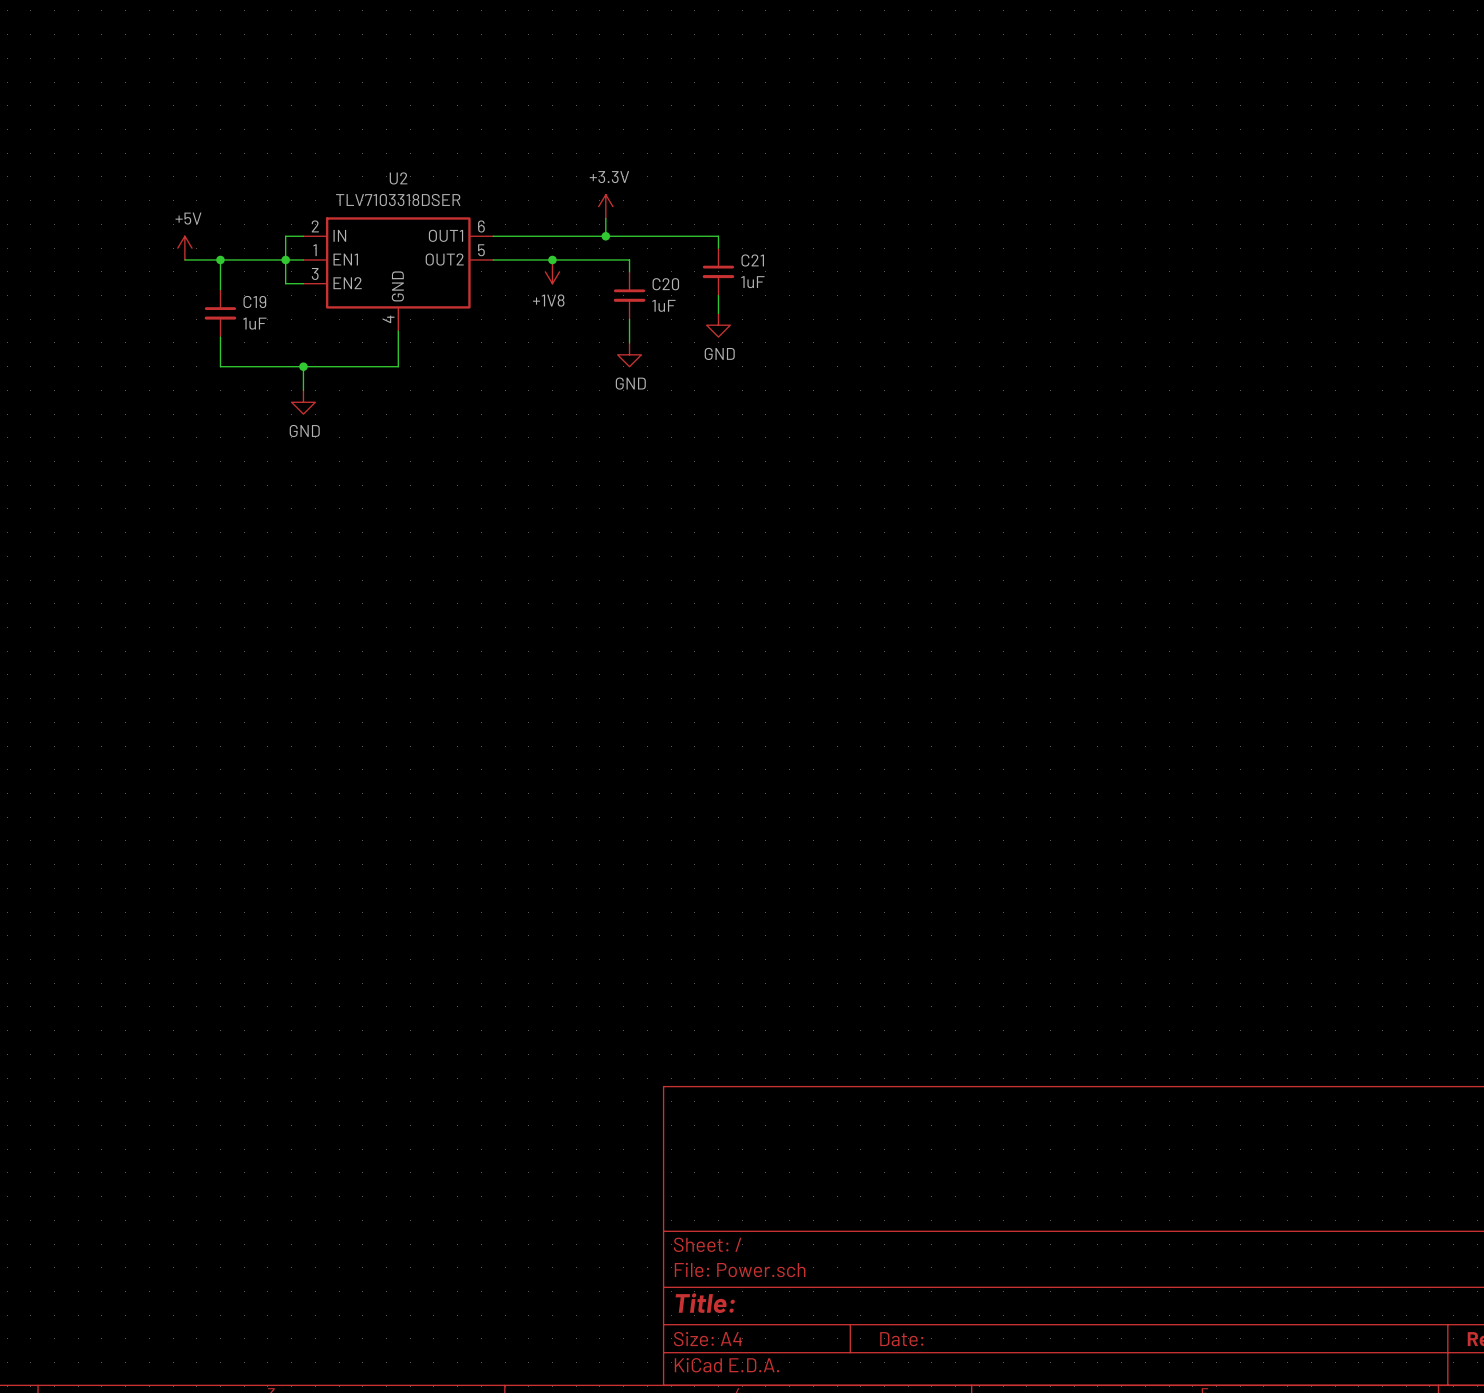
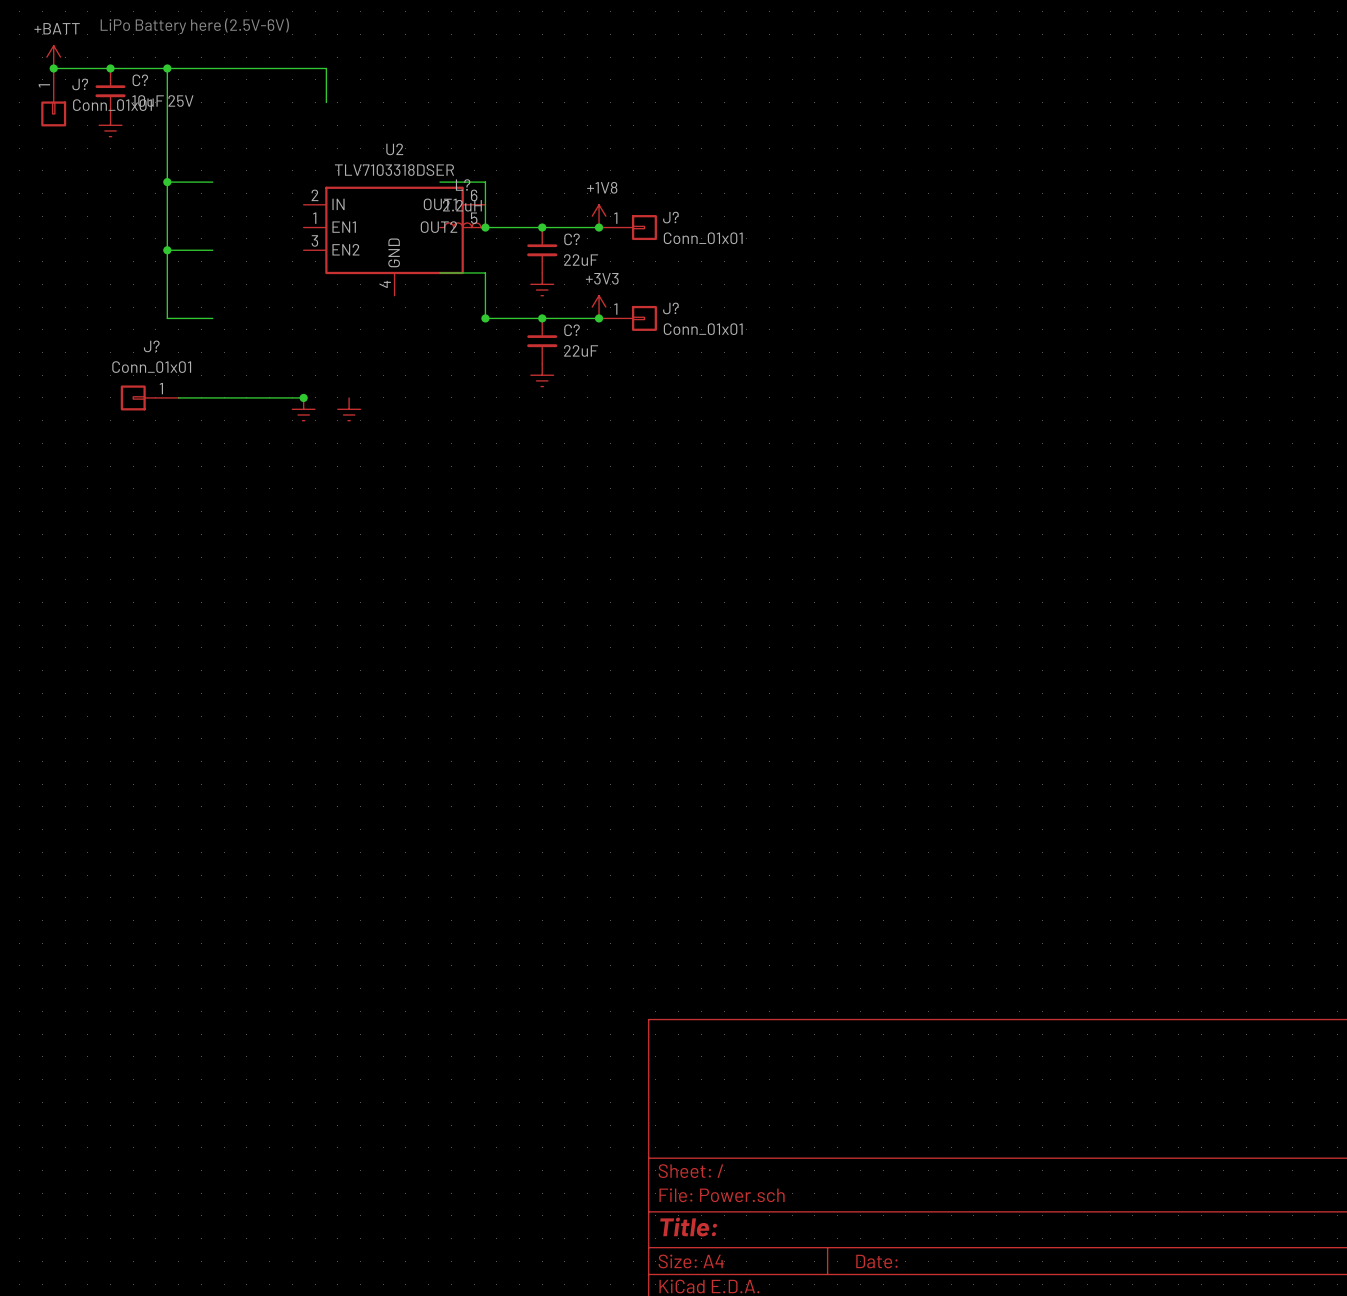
text: none -> LiPo Battery here (2.5V-6V) (194, 26)
power symbol: none -> +BATT (53, 57)
wire: none -> (53, 68) (326, 68) (326, 102)
junction: none -> (53, 68)
junction: none -> (110, 68)
wire: none -> (167, 68) (167, 318) (212, 318)
junction: none -> (167, 68)
C?: none -> (110, 91)
J?: none -> Conn_01x01 (53, 97)
power symbol: none -> (110, 125)
power symbol: +3.3V (605, 206) -> none
wire: none -> (167, 182) (212, 182)
junction: none -> (167, 182)
wire: none -> (439, 182) (485, 182) (485, 227)
wire: (605, 218) (605, 236) -> none
wire: (303, 236) (285, 236) (285, 283) (303, 283) -> none
wire: (493, 236) (718, 236) (718, 248) -> none
junction position: (605, 236) -> (599, 227)
power symbol: +5V (184, 248) -> none
L?: none -> (462, 225)
wire: (184, 259) (303, 259) -> none
wire: (220, 259) (220, 289) -> none
junction: (220, 259) -> none
junction: (285, 259) -> none
junction: none -> (485, 227)
wire: (611, 259) (629, 259) (629, 271) -> none
J?: none -> Conn_01x01 (628, 227)
power symbol rotation: 0° (552, 271) -> 180° (599, 216)
power symbol position: +1V8 (552, 271) -> +1V8 (599, 216)
C21: (718, 271) -> none
wire: none -> (167, 250) (212, 250)
junction: none -> (167, 250)
C?: none -> (542, 250)
C20: (629, 295) -> none
wire: (718, 295) (718, 313) -> none
wire: none -> (439, 272) (485, 272) (485, 318) (599, 318)
C19: (220, 313) -> none
power symbol: none -> (542, 284)
wire: (629, 319) (629, 342) -> none
power symbol: GND (718, 325) -> none
wire: (398, 331) (398, 366) (220, 366) (220, 337) -> none
power symbol: none -> +3V3 (599, 307)
junction: none -> (485, 318)
junction: none -> (542, 318)
junction: none -> (599, 318)
power symbol: GND (629, 354) -> none
J?: none -> Conn_01x01 (628, 318)
wire: (303, 366) (303, 390) -> none
junction: (303, 366) -> none
C?: none -> (542, 341)
power symbol: GND (303, 402) -> none
power symbol: none -> (542, 375)
J?: none -> Conn_01x01 (149, 397)
wire: none -> (178, 397) (303, 397)
junction: none -> (303, 397)
power symbol: none -> (303, 409)
power symbol: none -> (349, 409)

